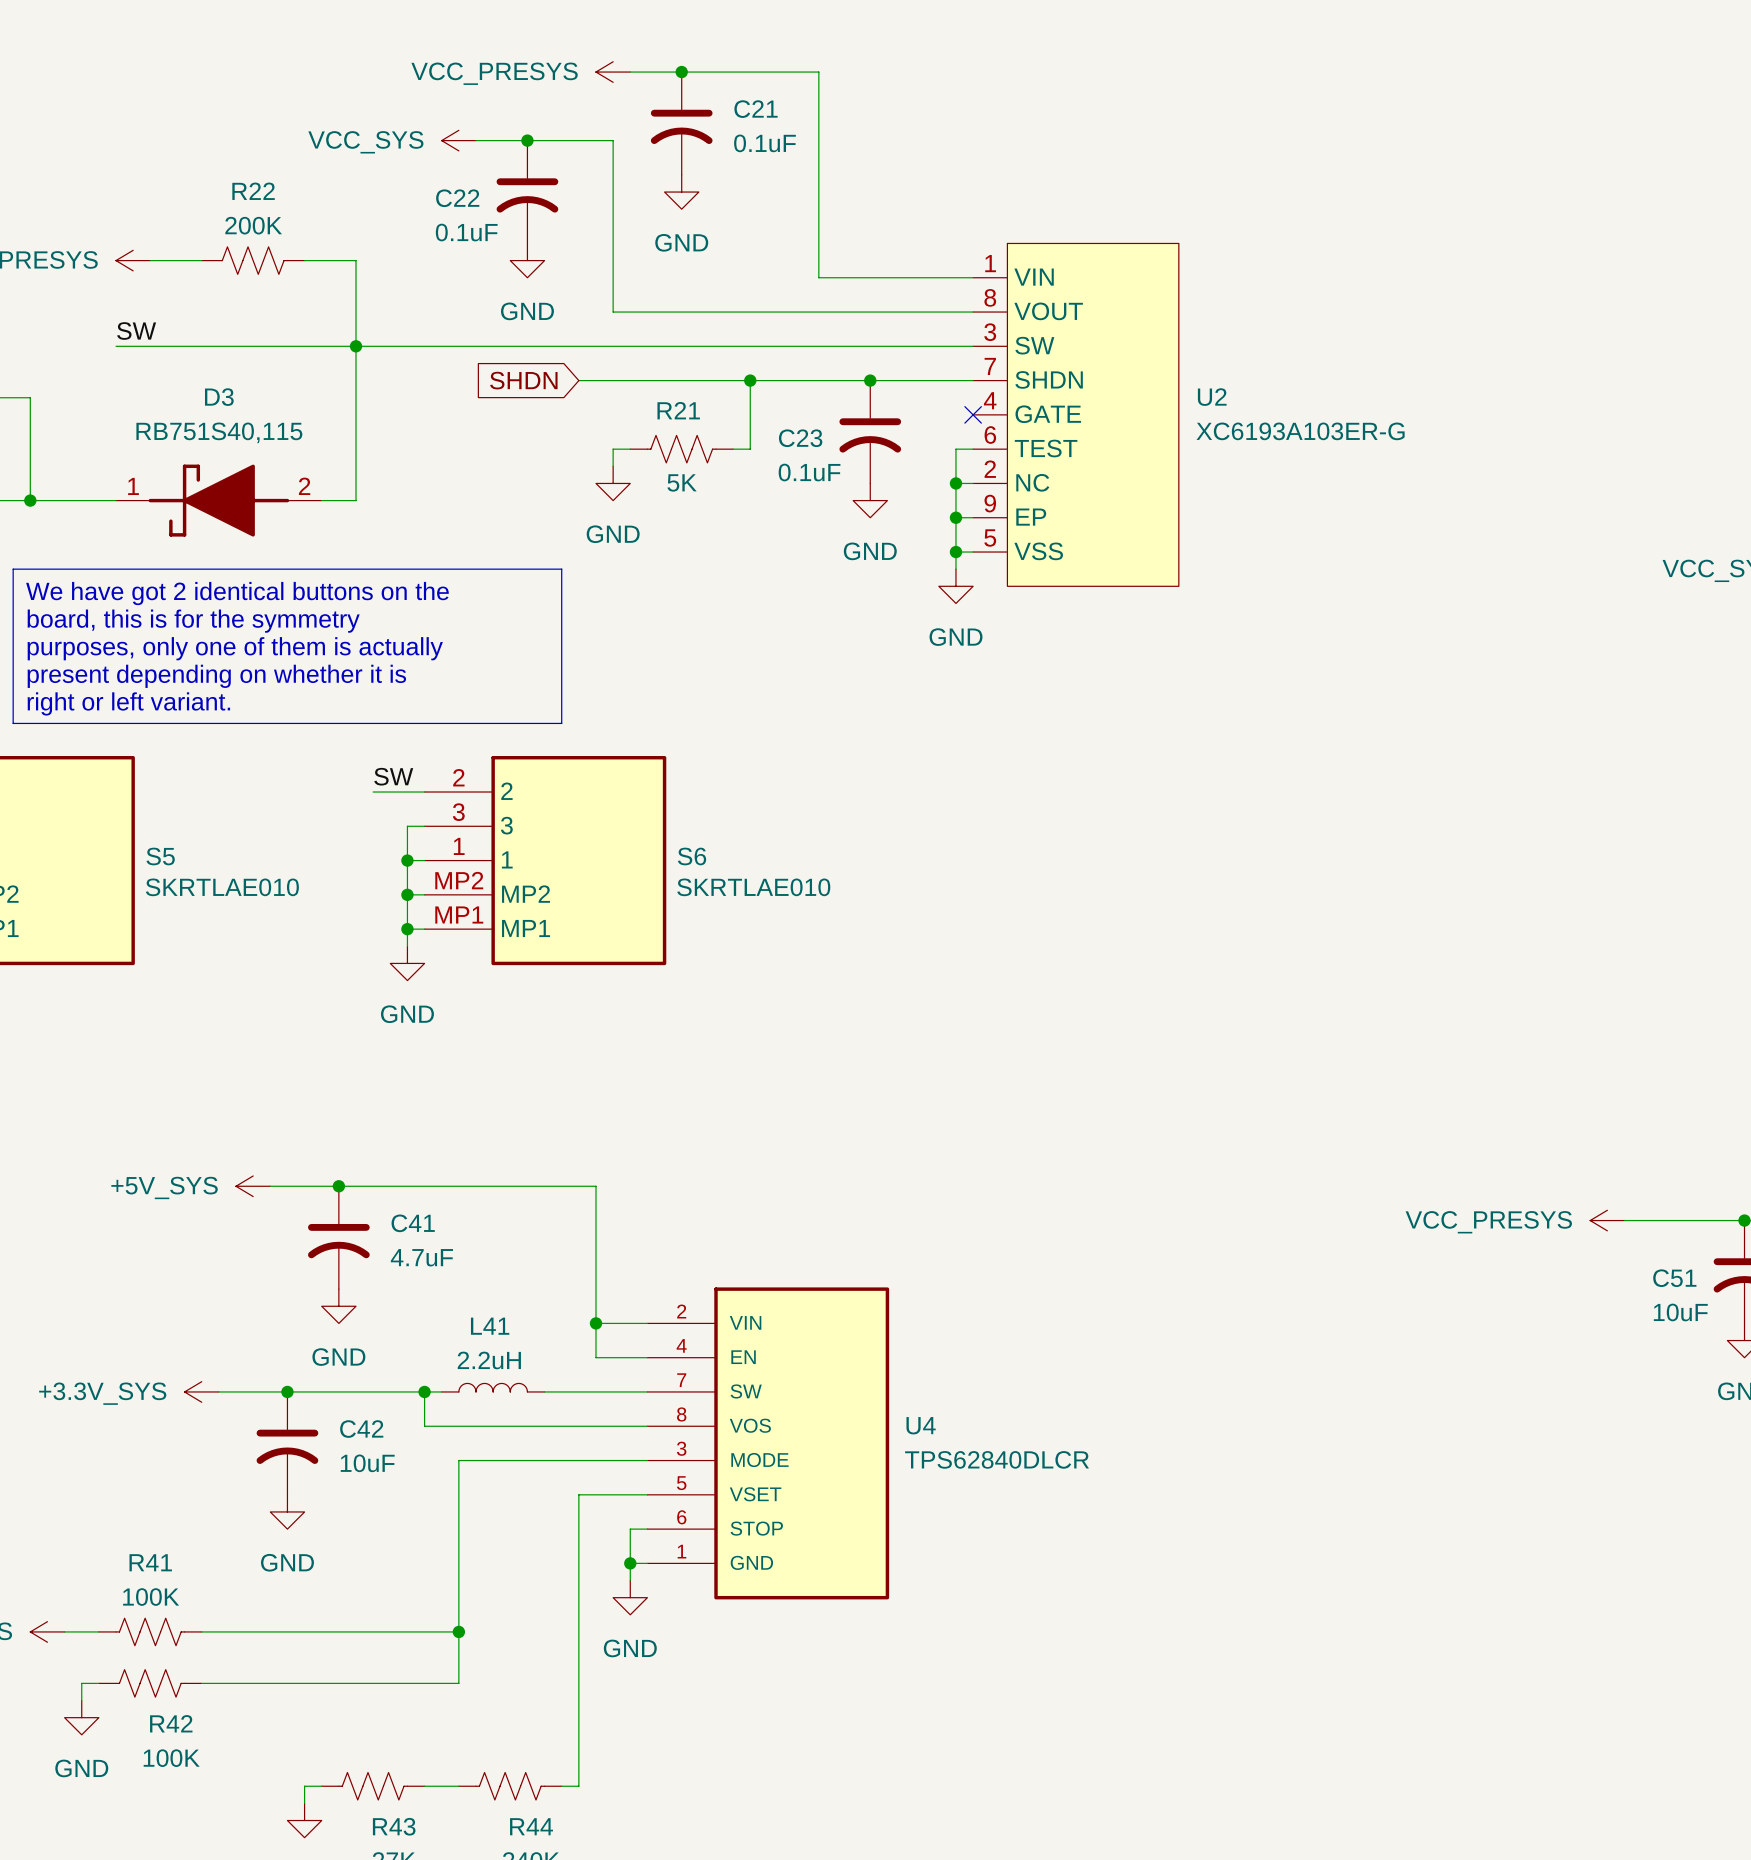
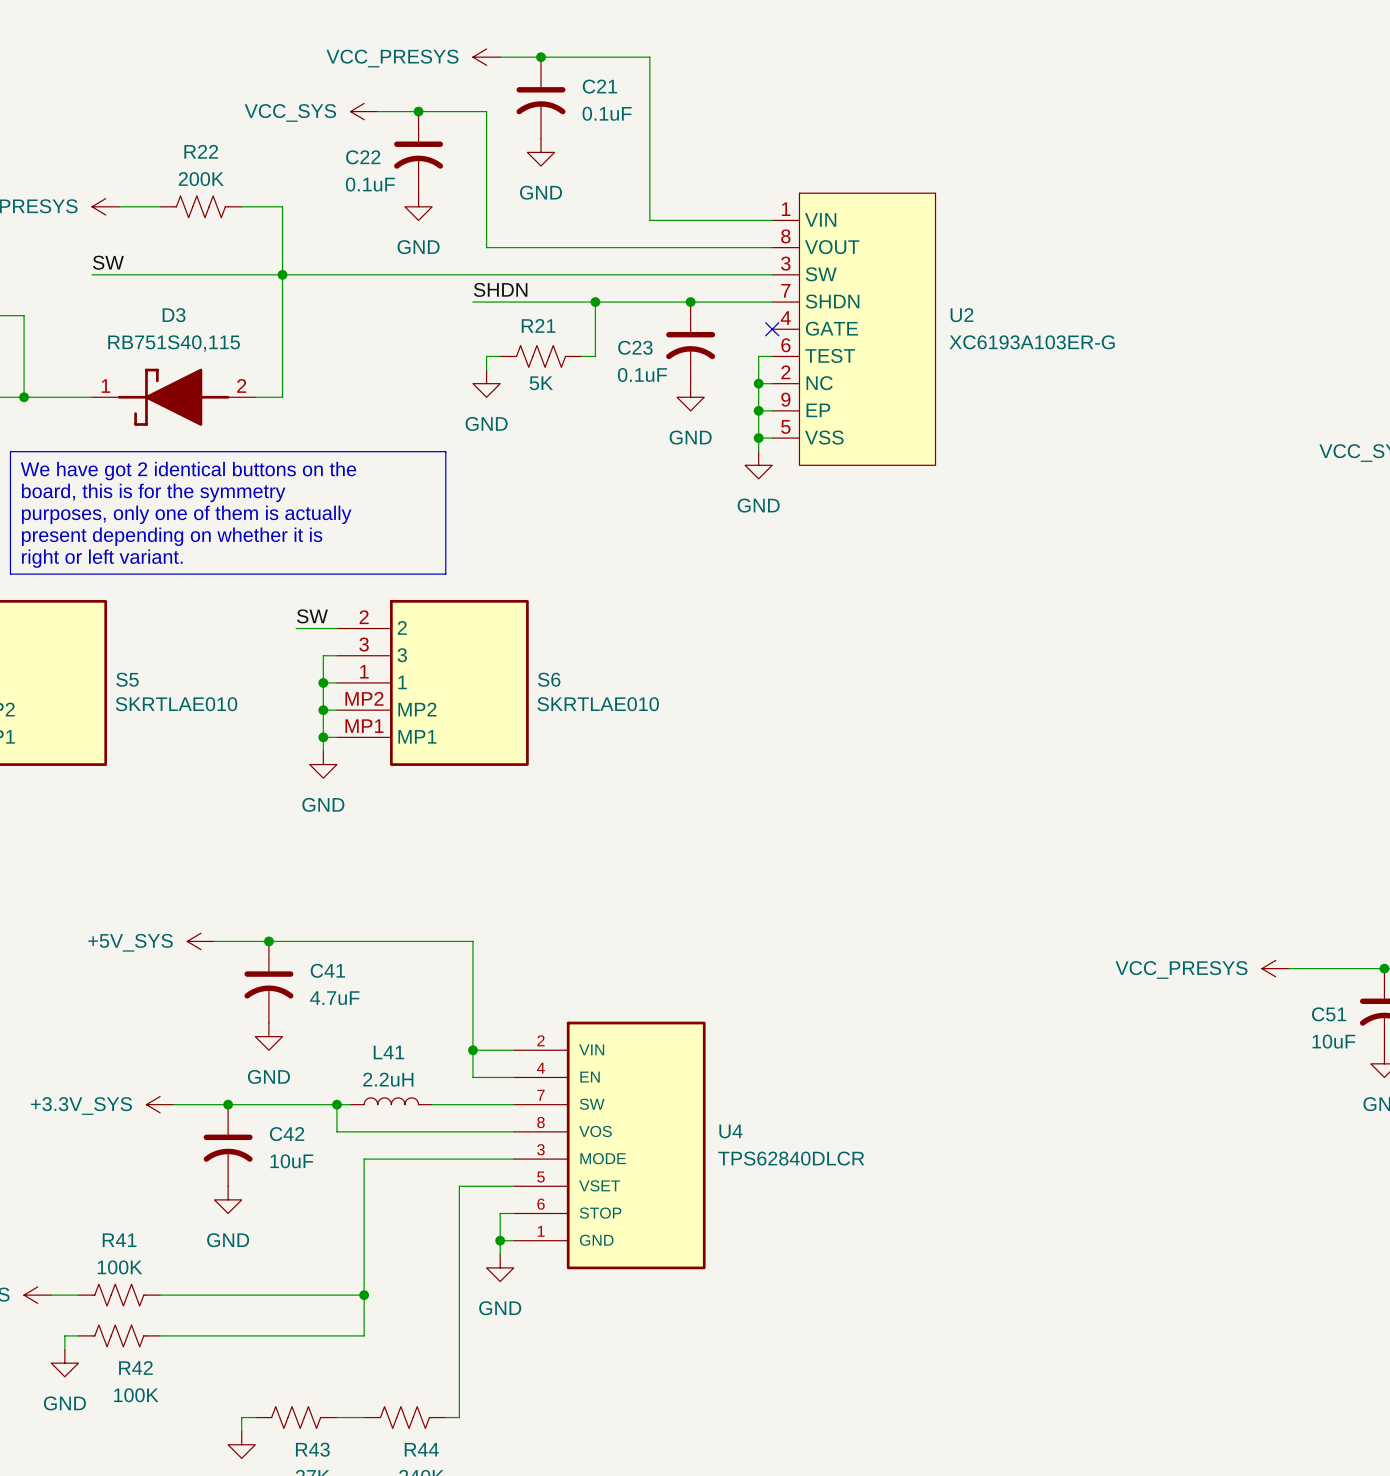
label: none -> SHDN (500, 289)
global label: SHDN (523, 380) -> none
wire: (578, 380) (596, 380) -> none

